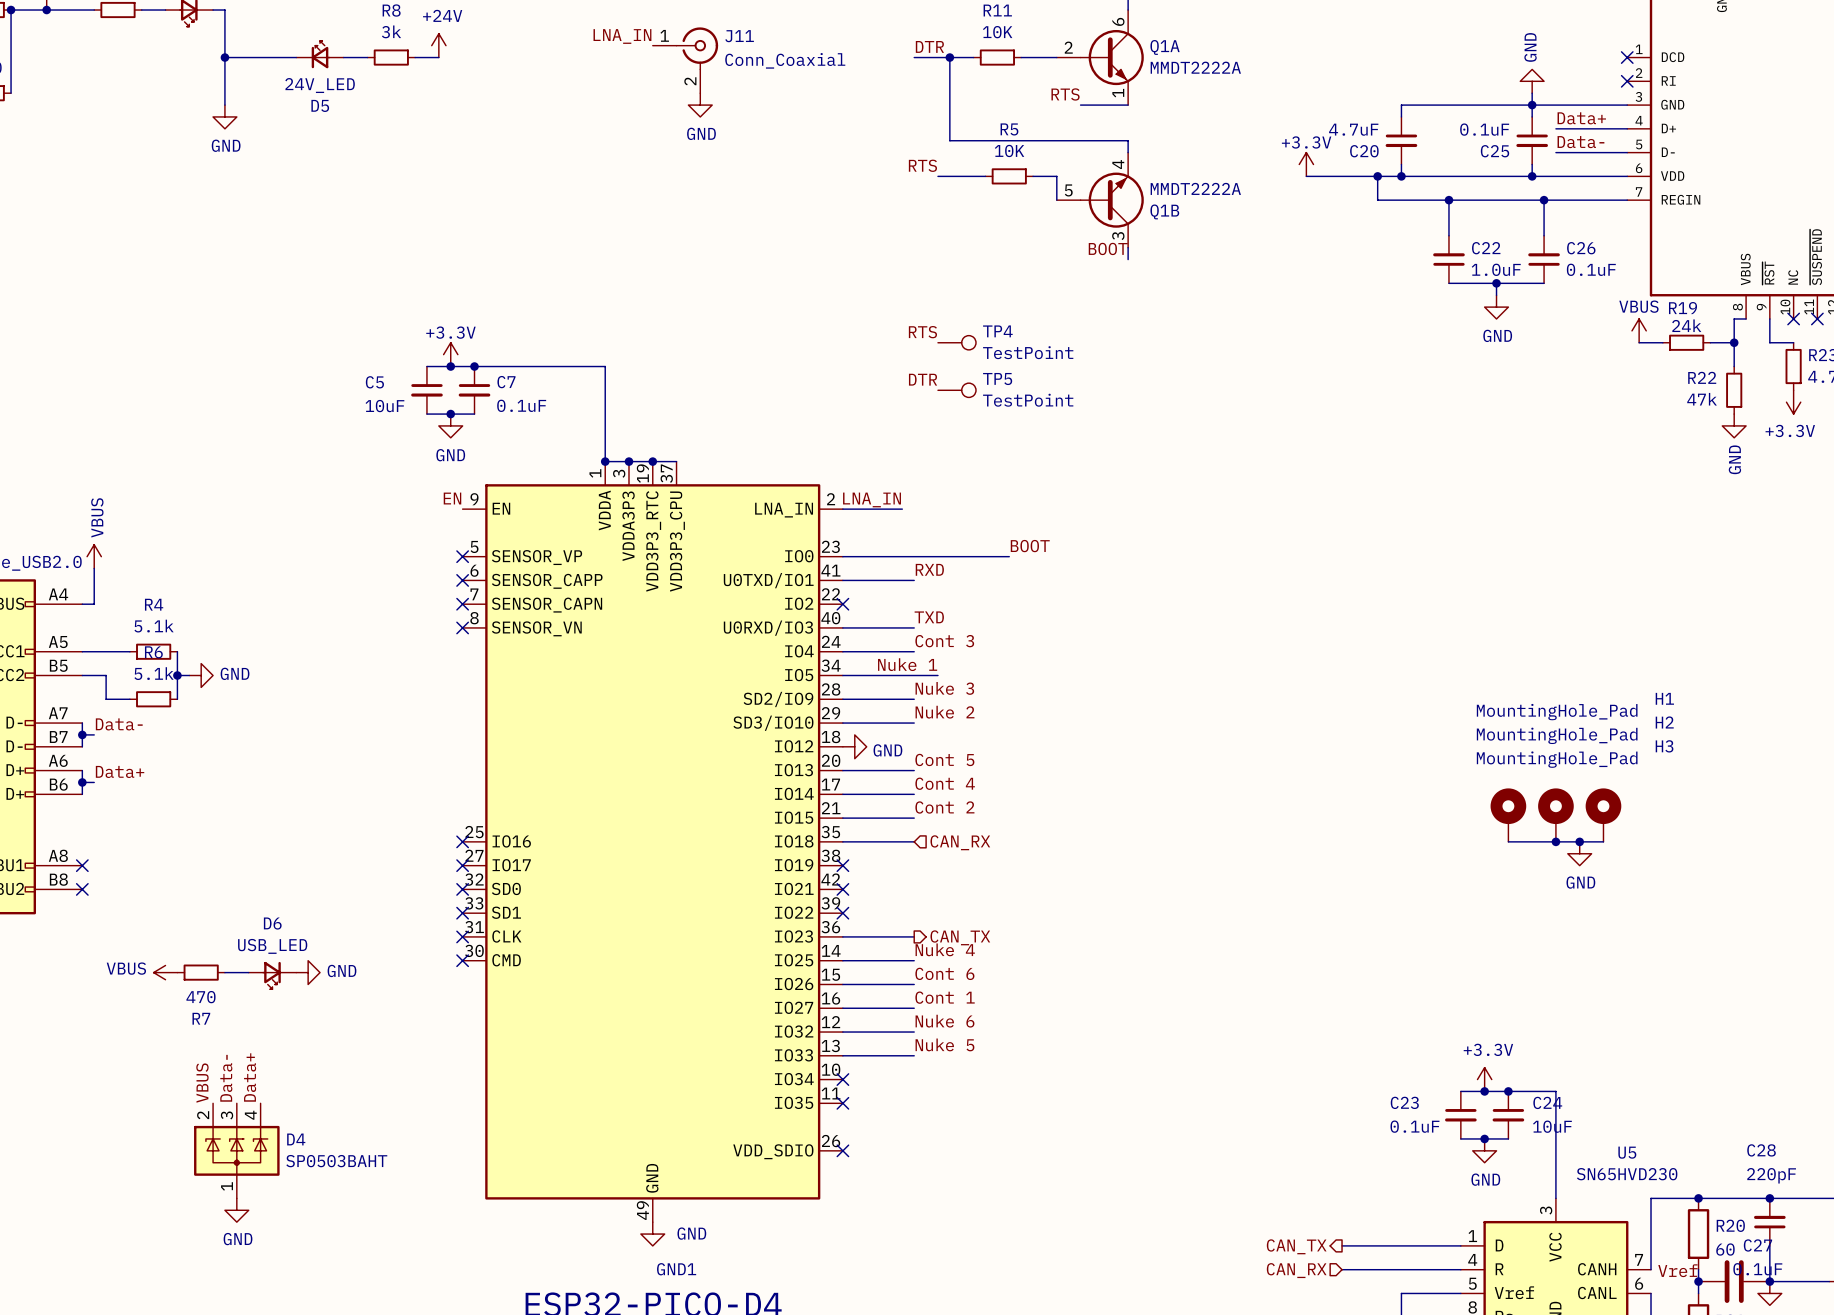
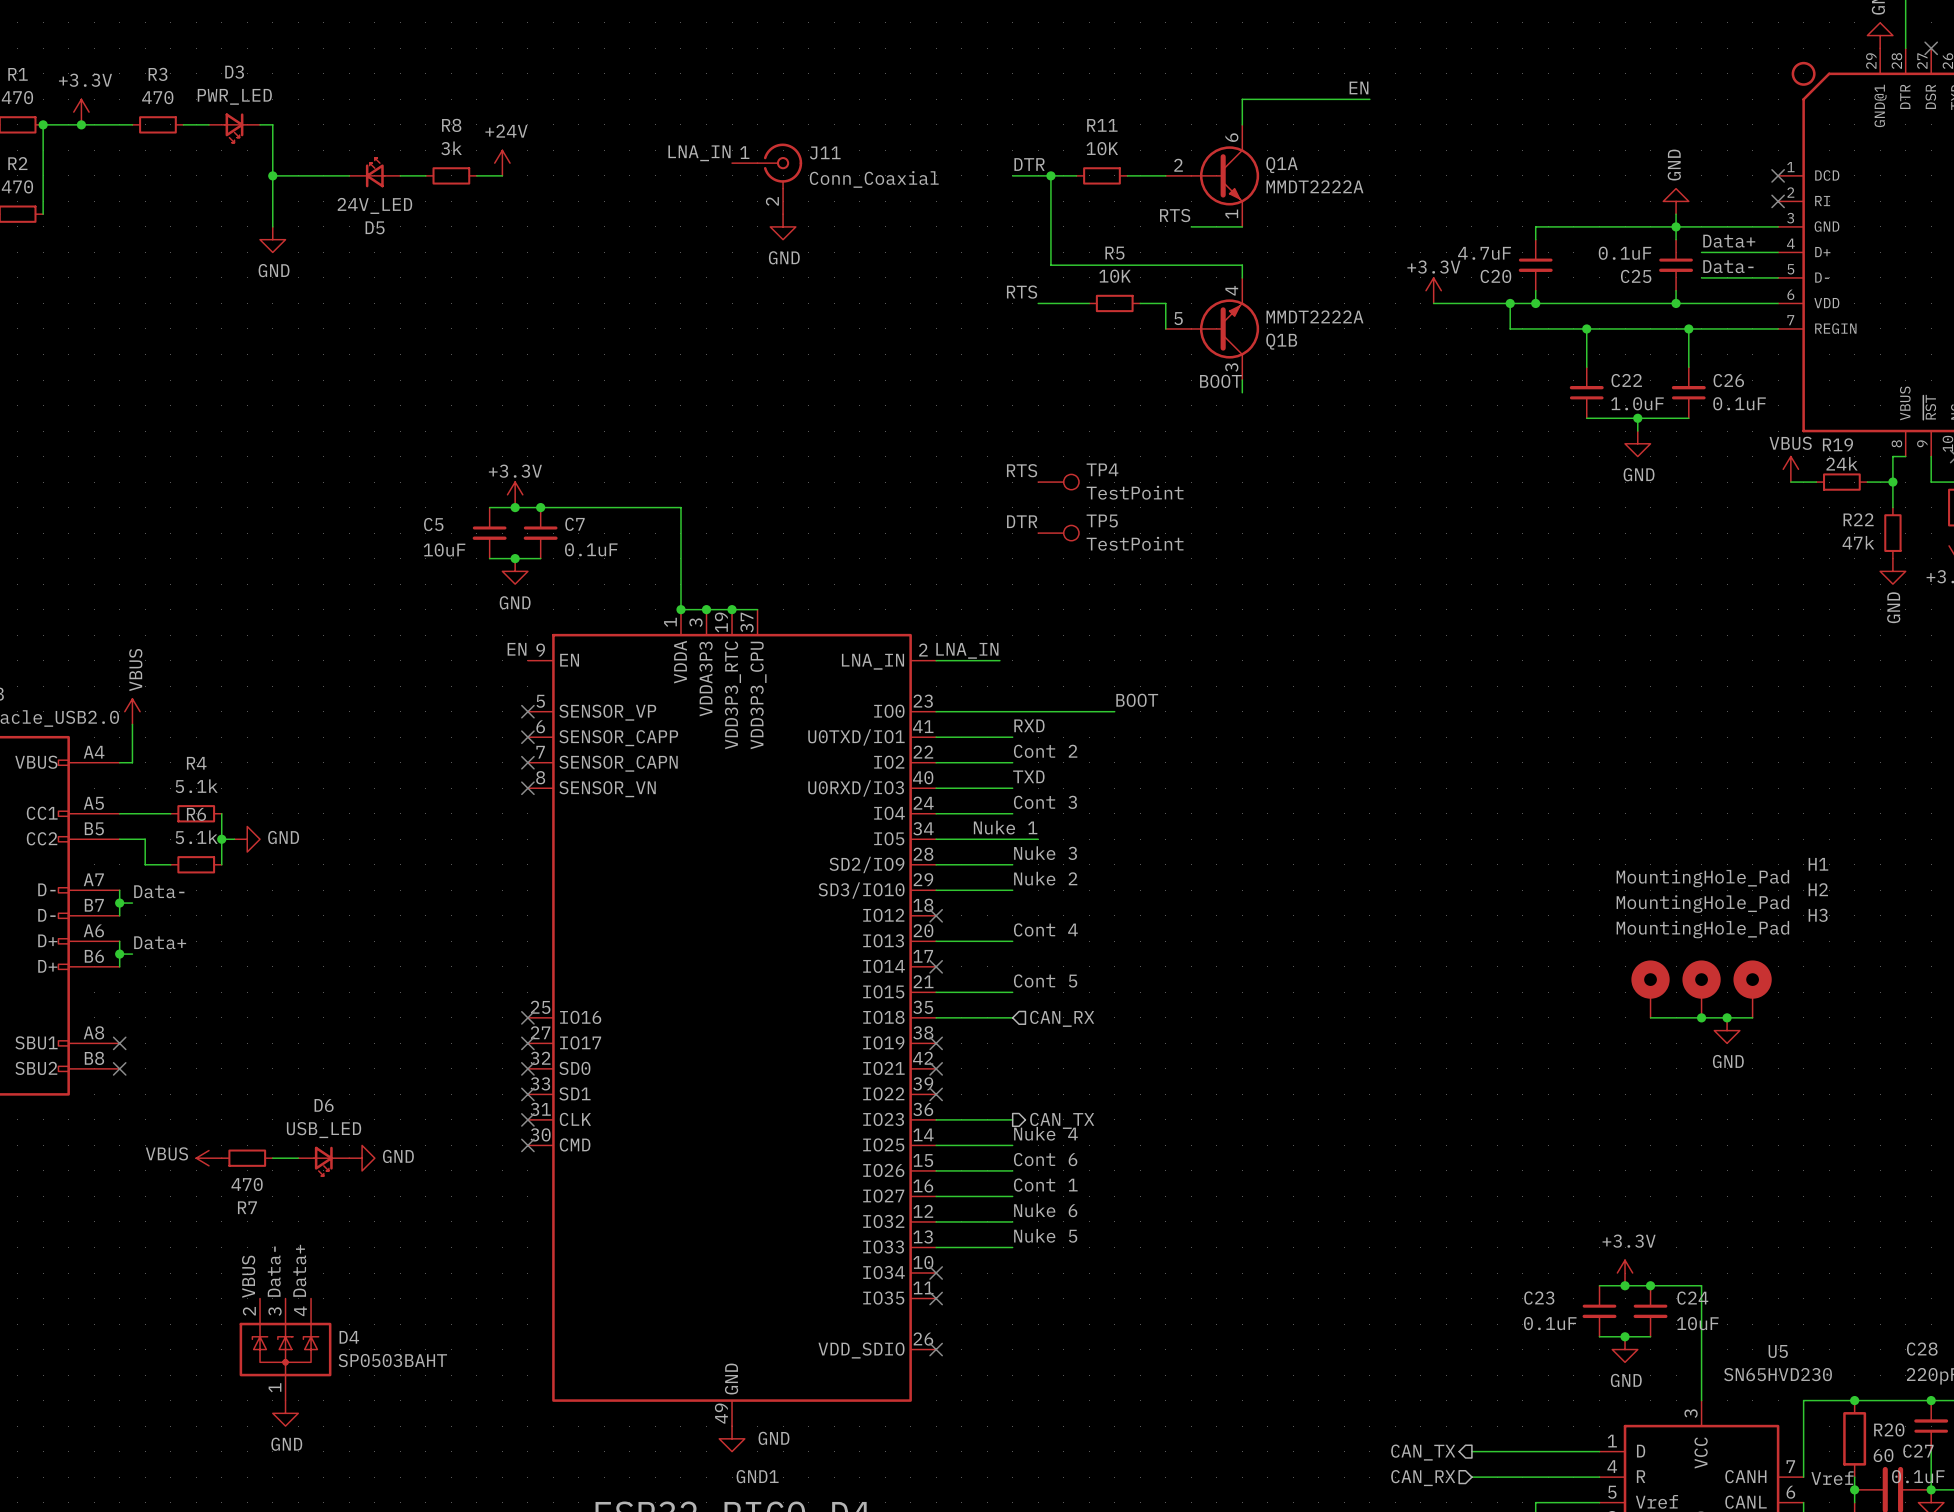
label: none -> Cont 2 (1045, 751)
no-connect mark: (842, 604) -> none
no-connect mark: none -> (936, 915)
power symbol: GND (854, 746) -> none
label: Cont 5 (944, 759) -> Cont 4 (1045, 929)
label: Cont 4 (945, 783) -> none
wire: (842, 794) (914, 794) -> (936, 762) (1012, 762)
no-connect mark: none -> (936, 966)
label: Cont 2 (944, 807) -> Cont 5 (1045, 980)

